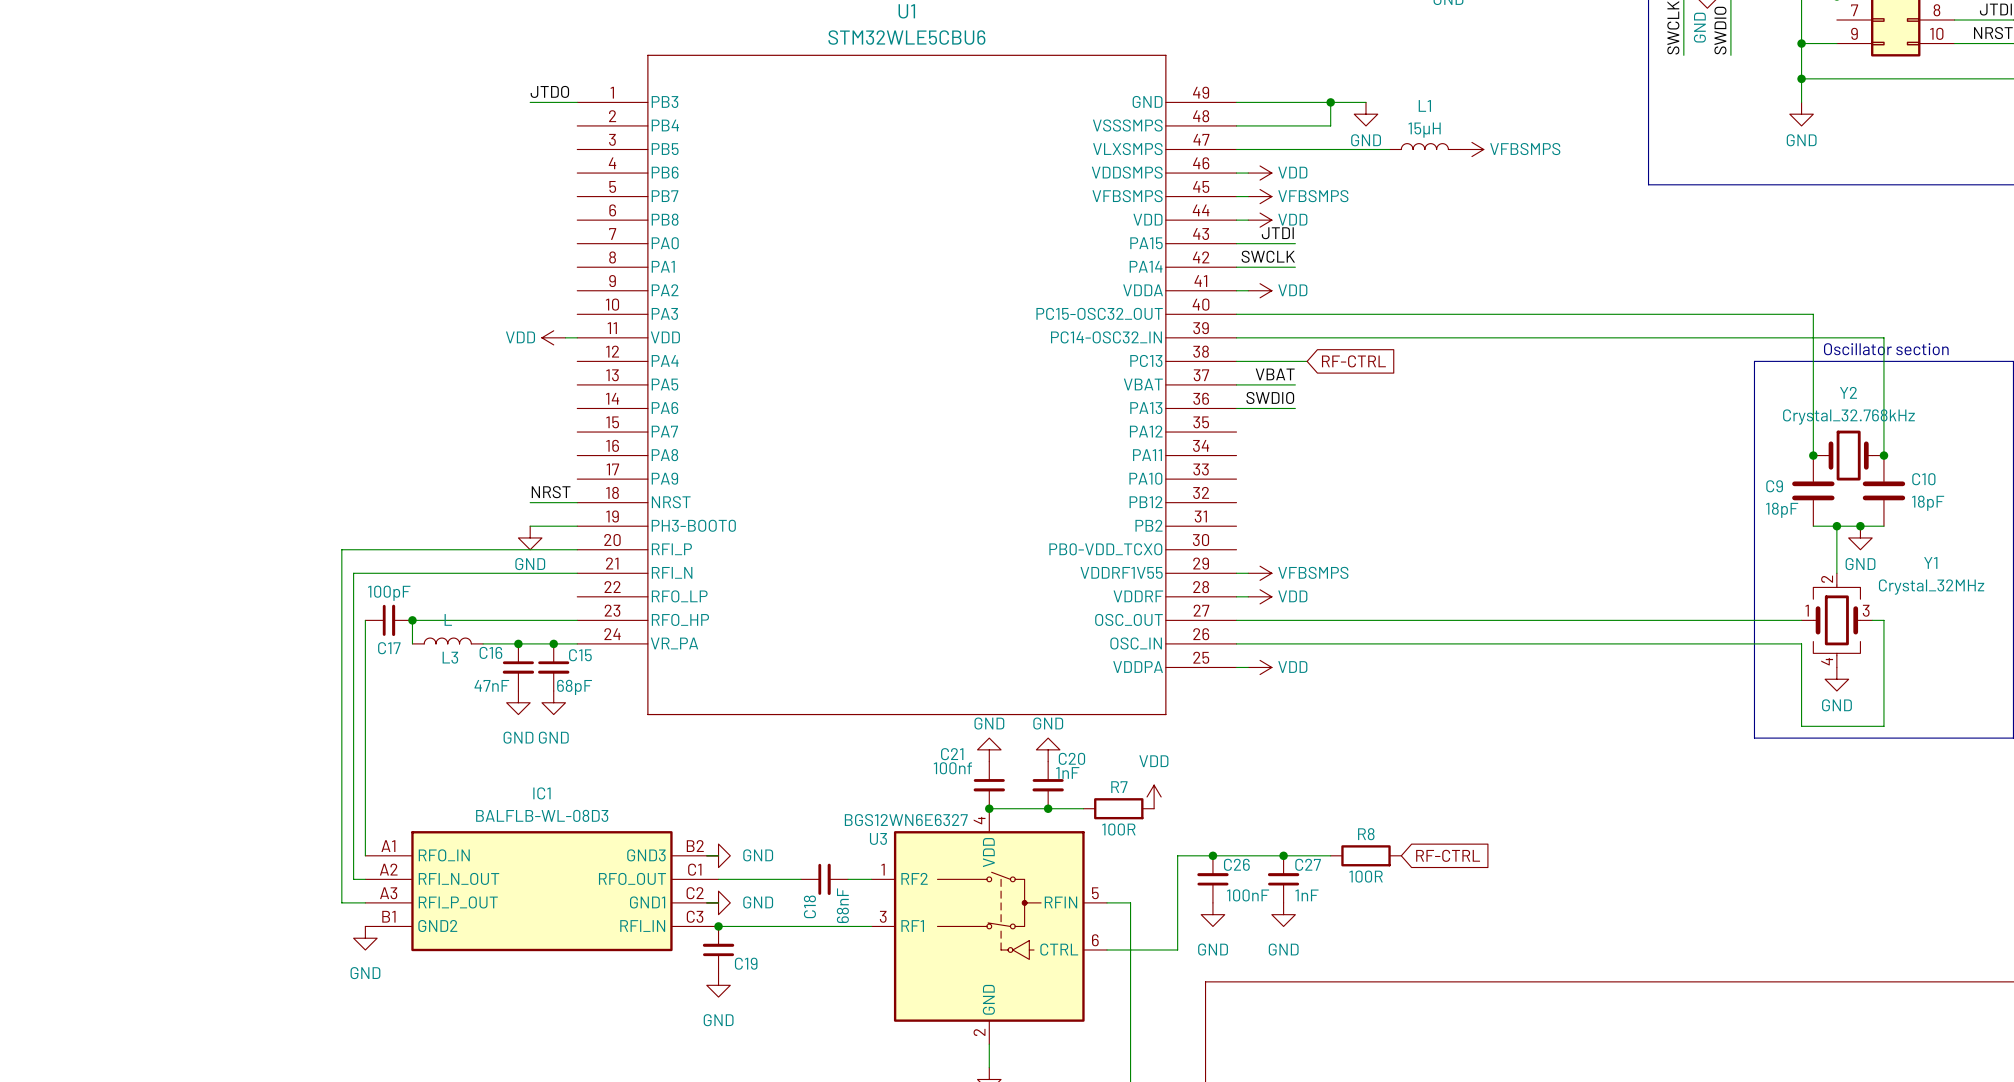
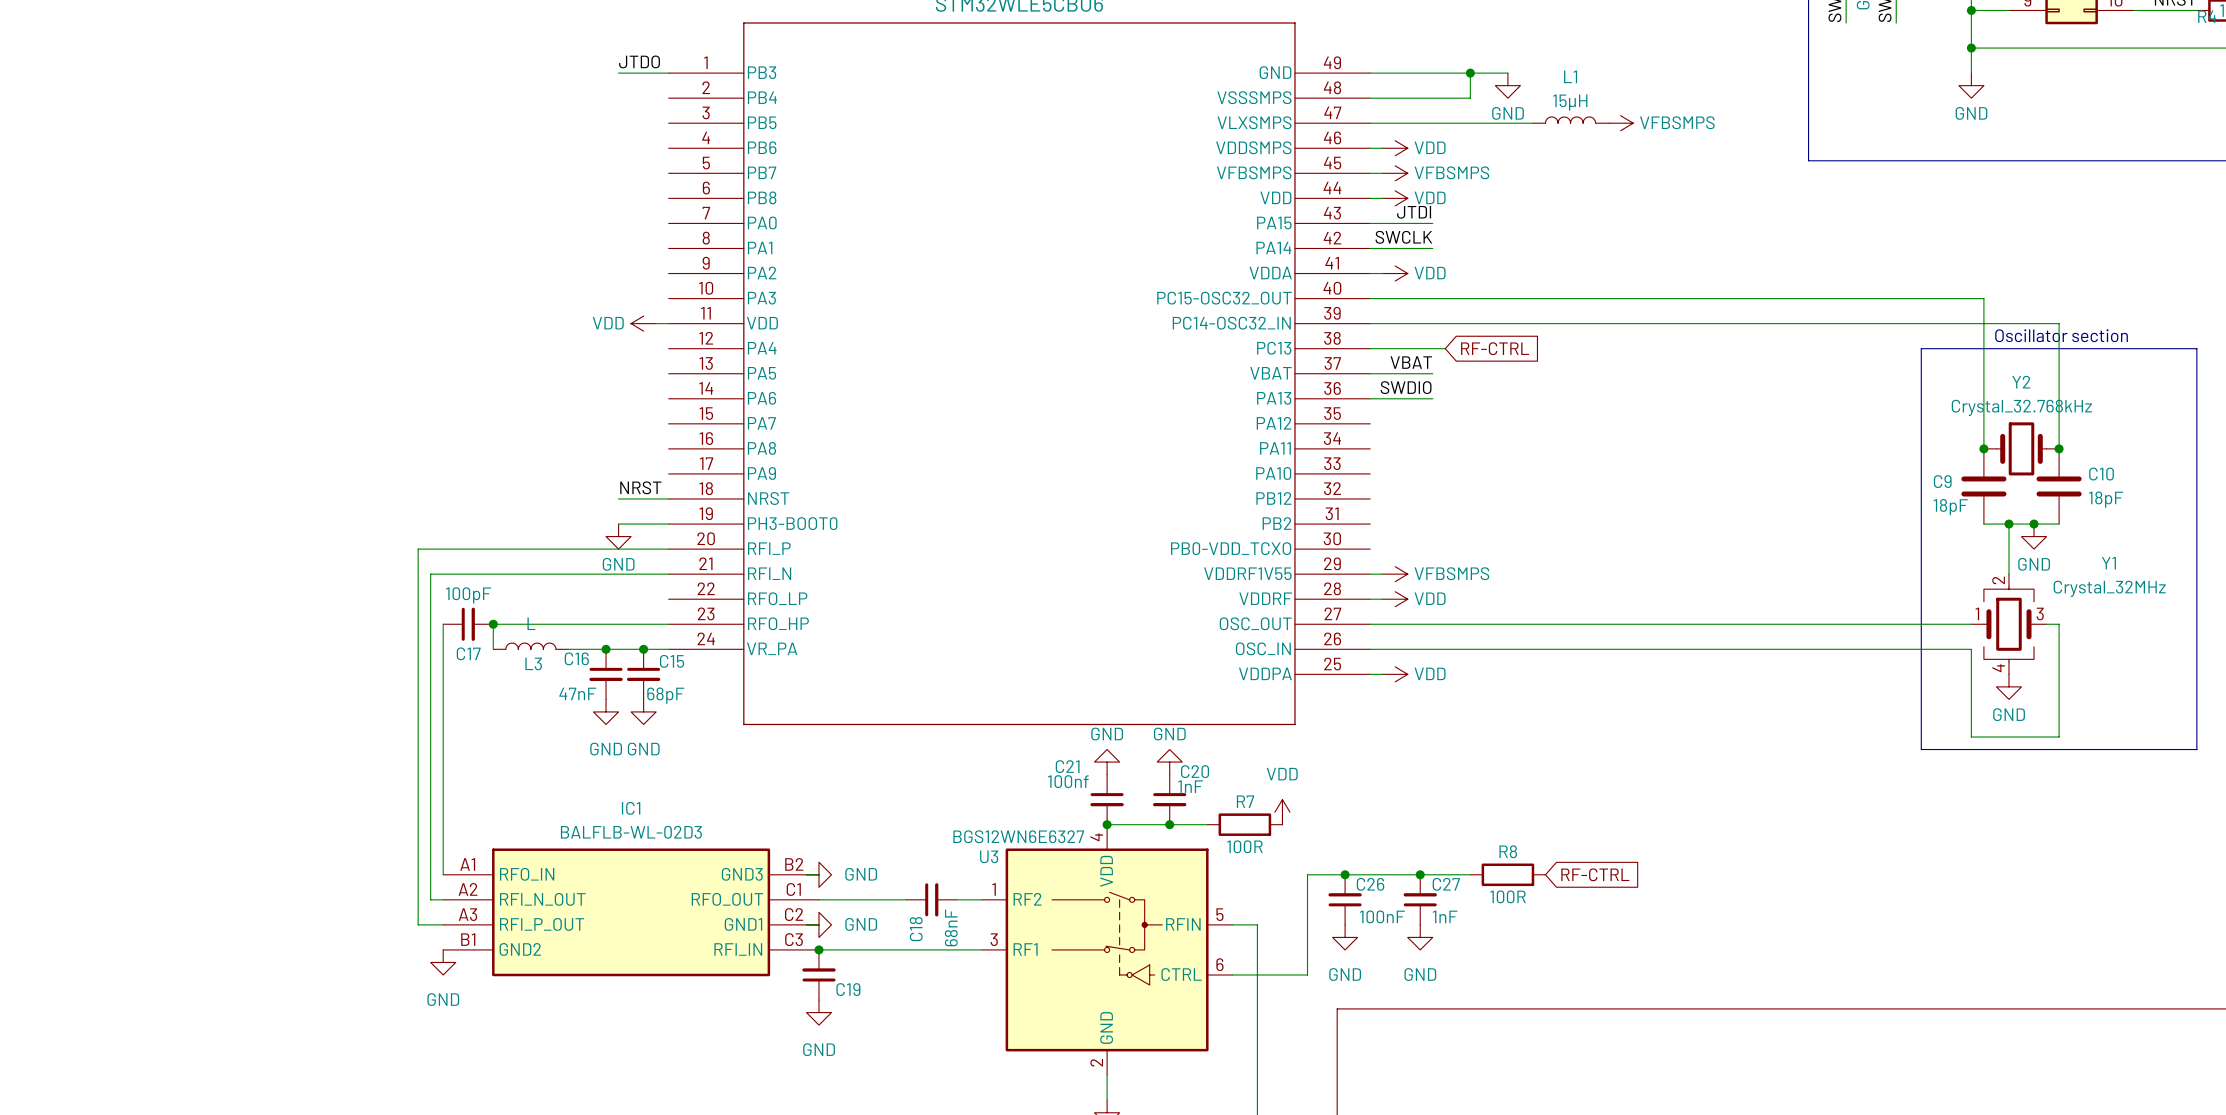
IC1 value: BALFLB-WL-08D3 (542, 815) -> BALFLB-WL-02D3 (631, 832)

